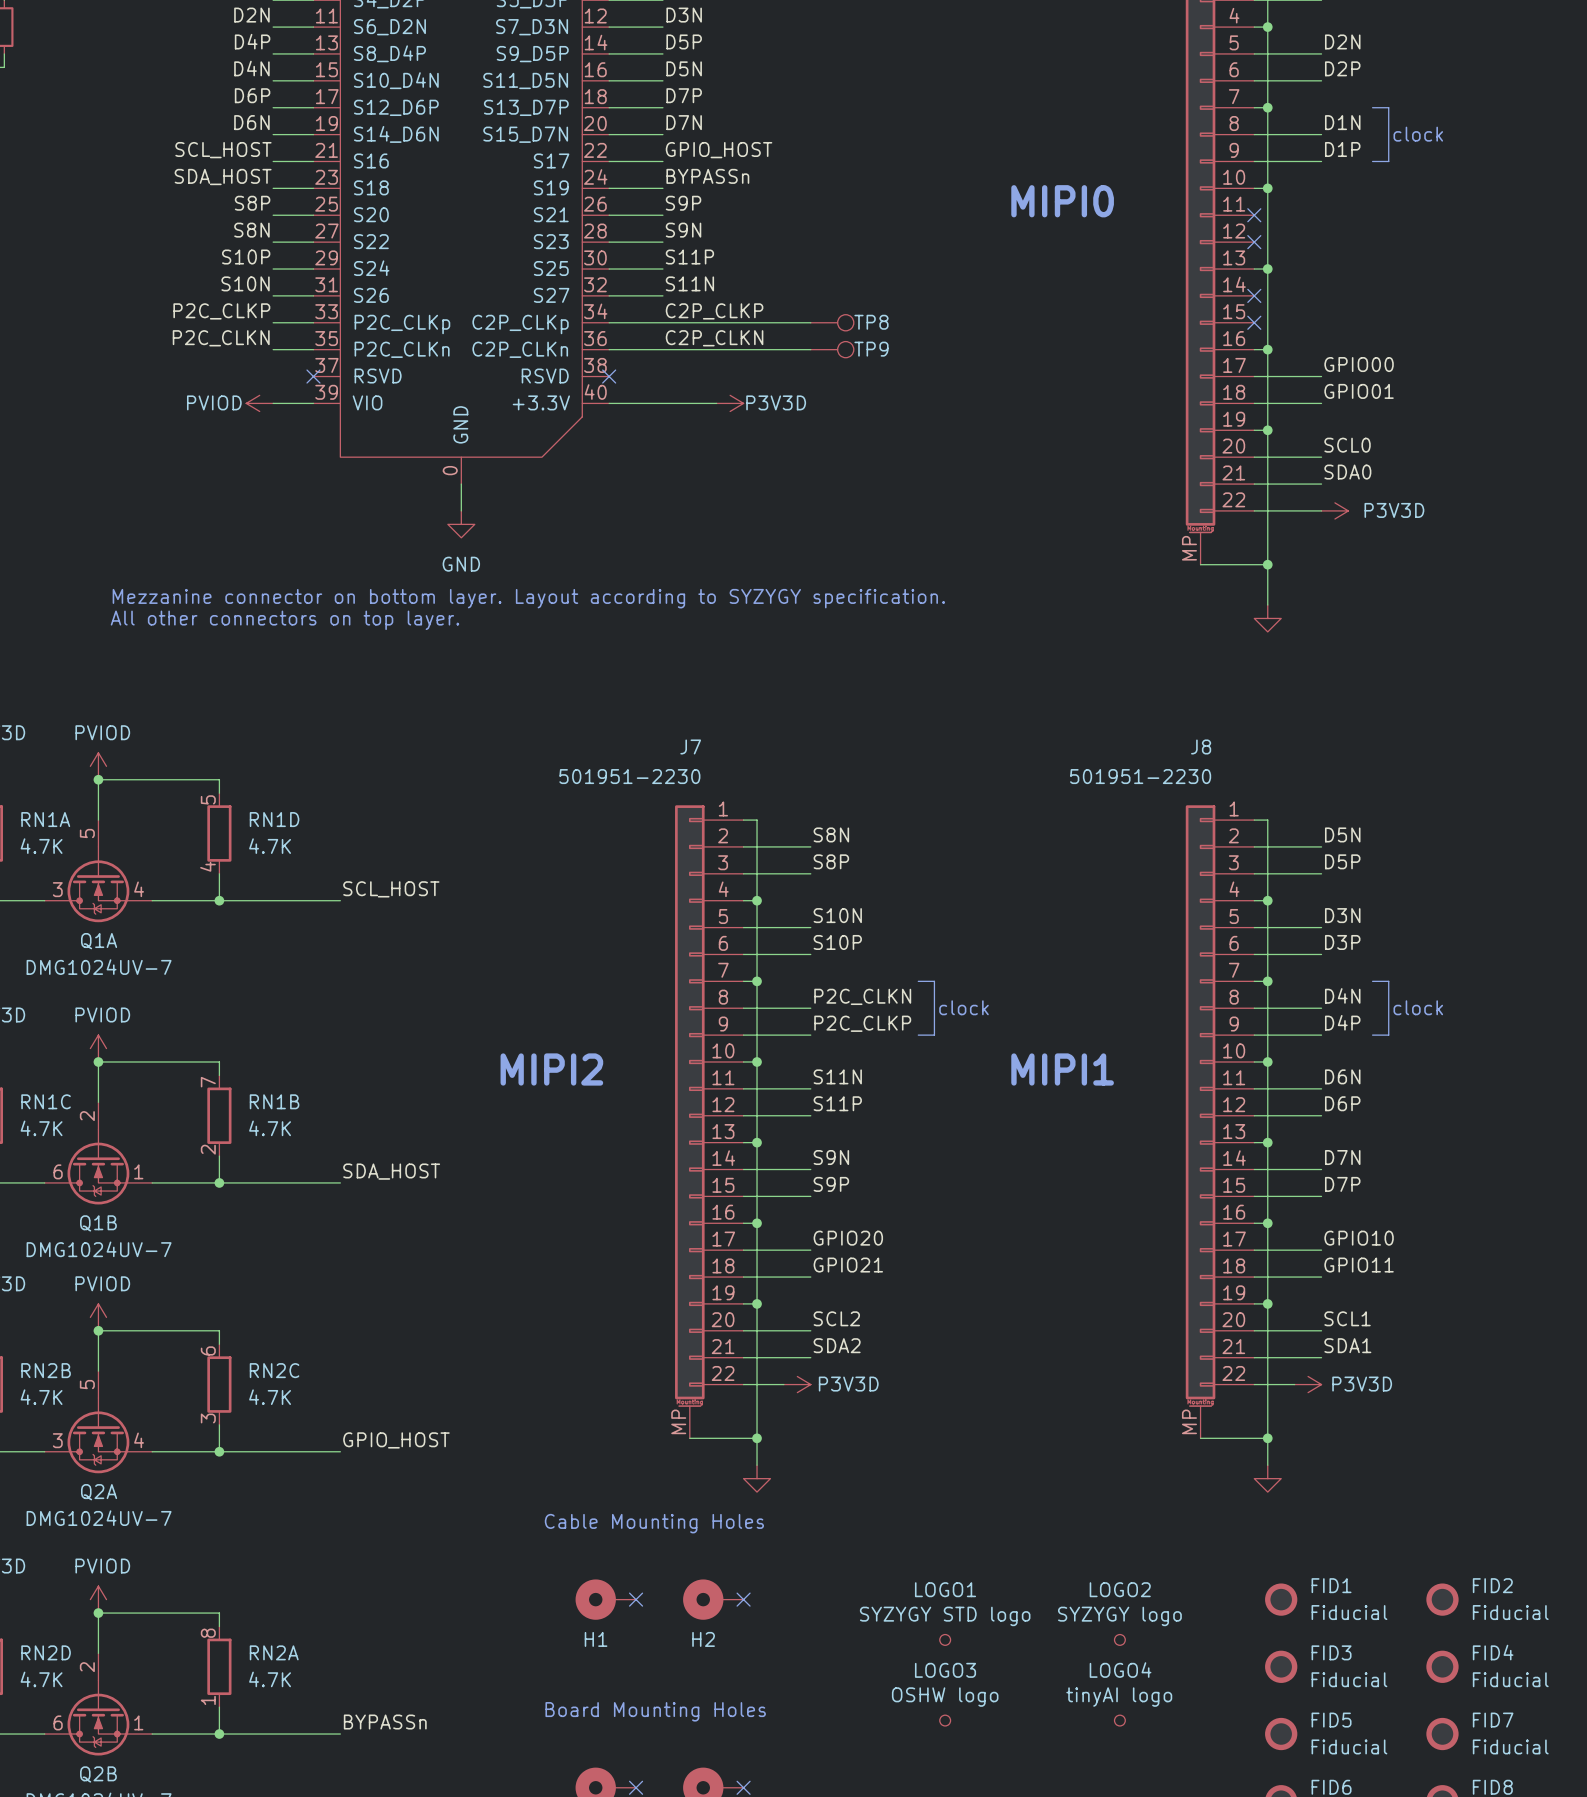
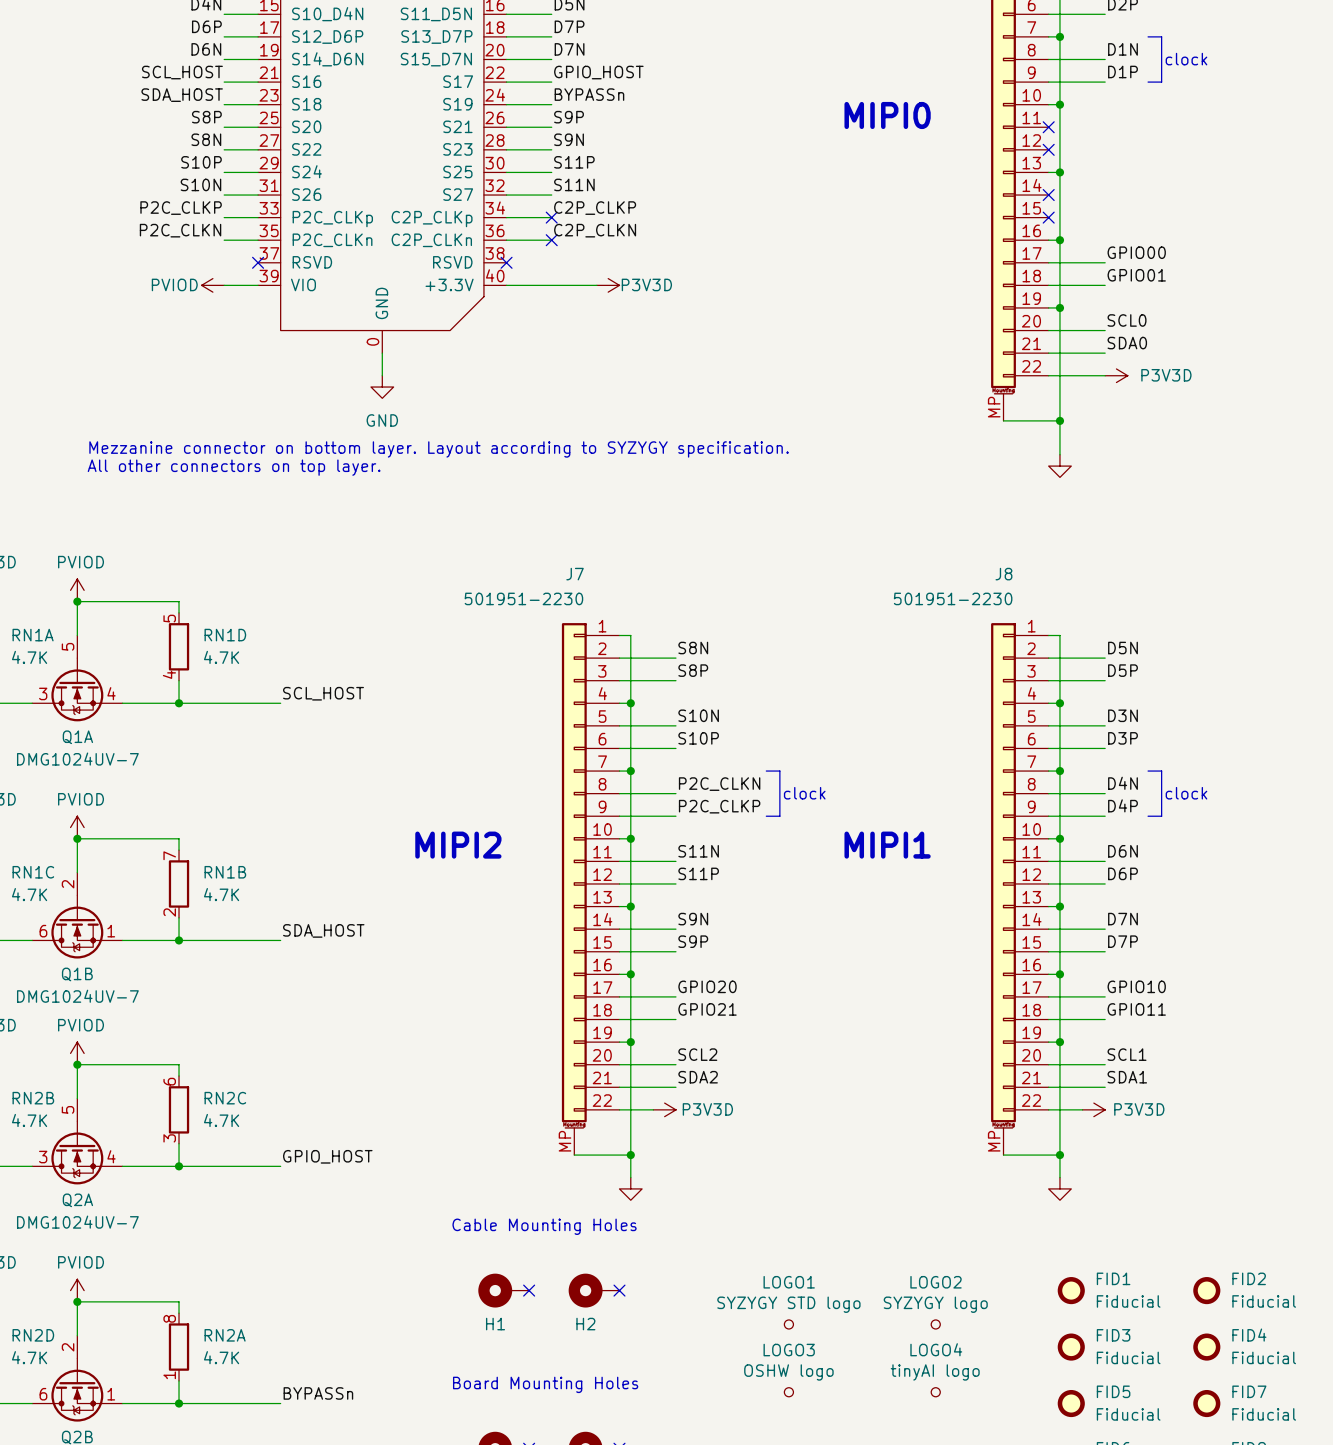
wire: (662, 322) (810, 322) -> none
no-connect mark: none -> (551, 217)
TP8: (832, 322) -> none
wire: (662, 349) (810, 349) -> none
no-connect mark: none -> (551, 240)
TP9: (832, 349) -> none

